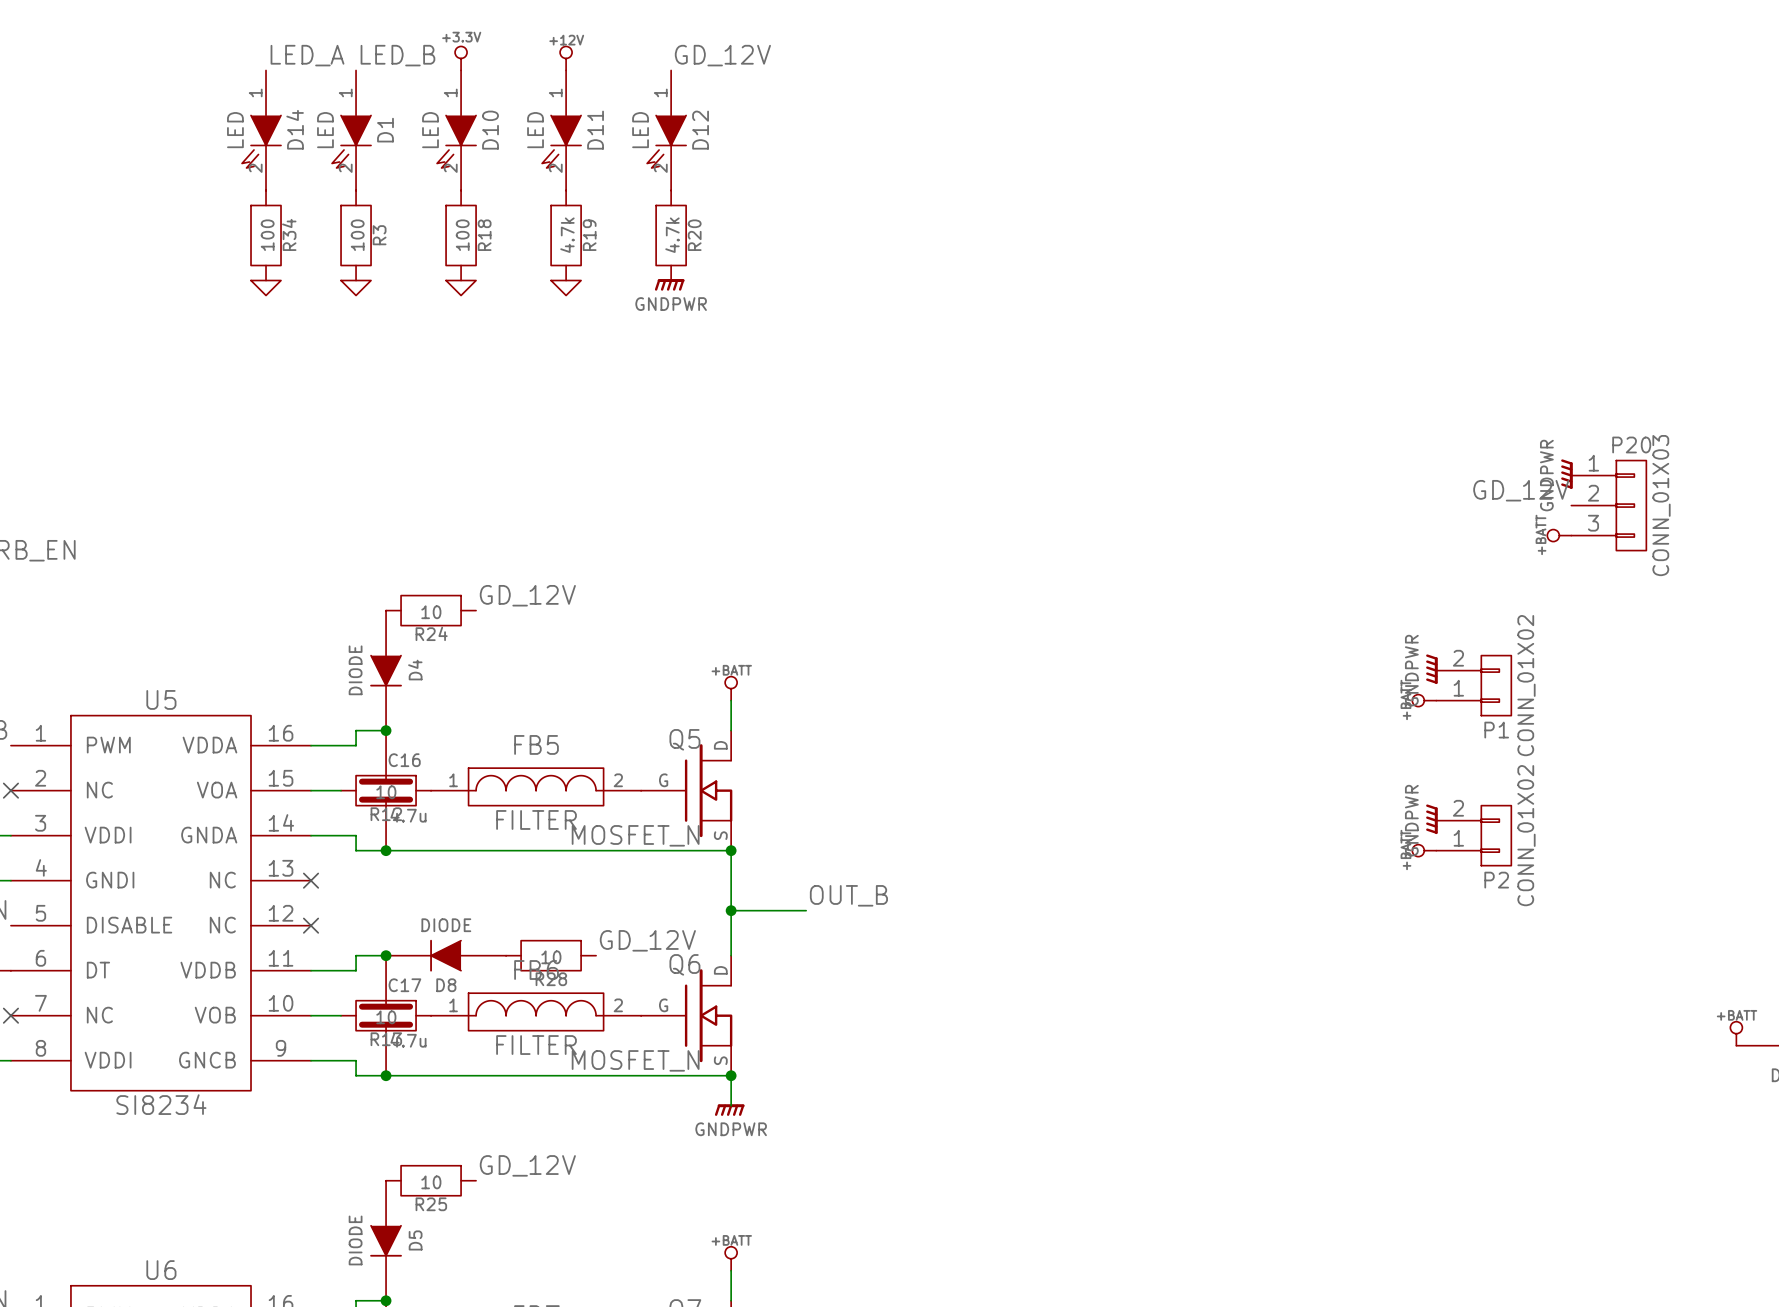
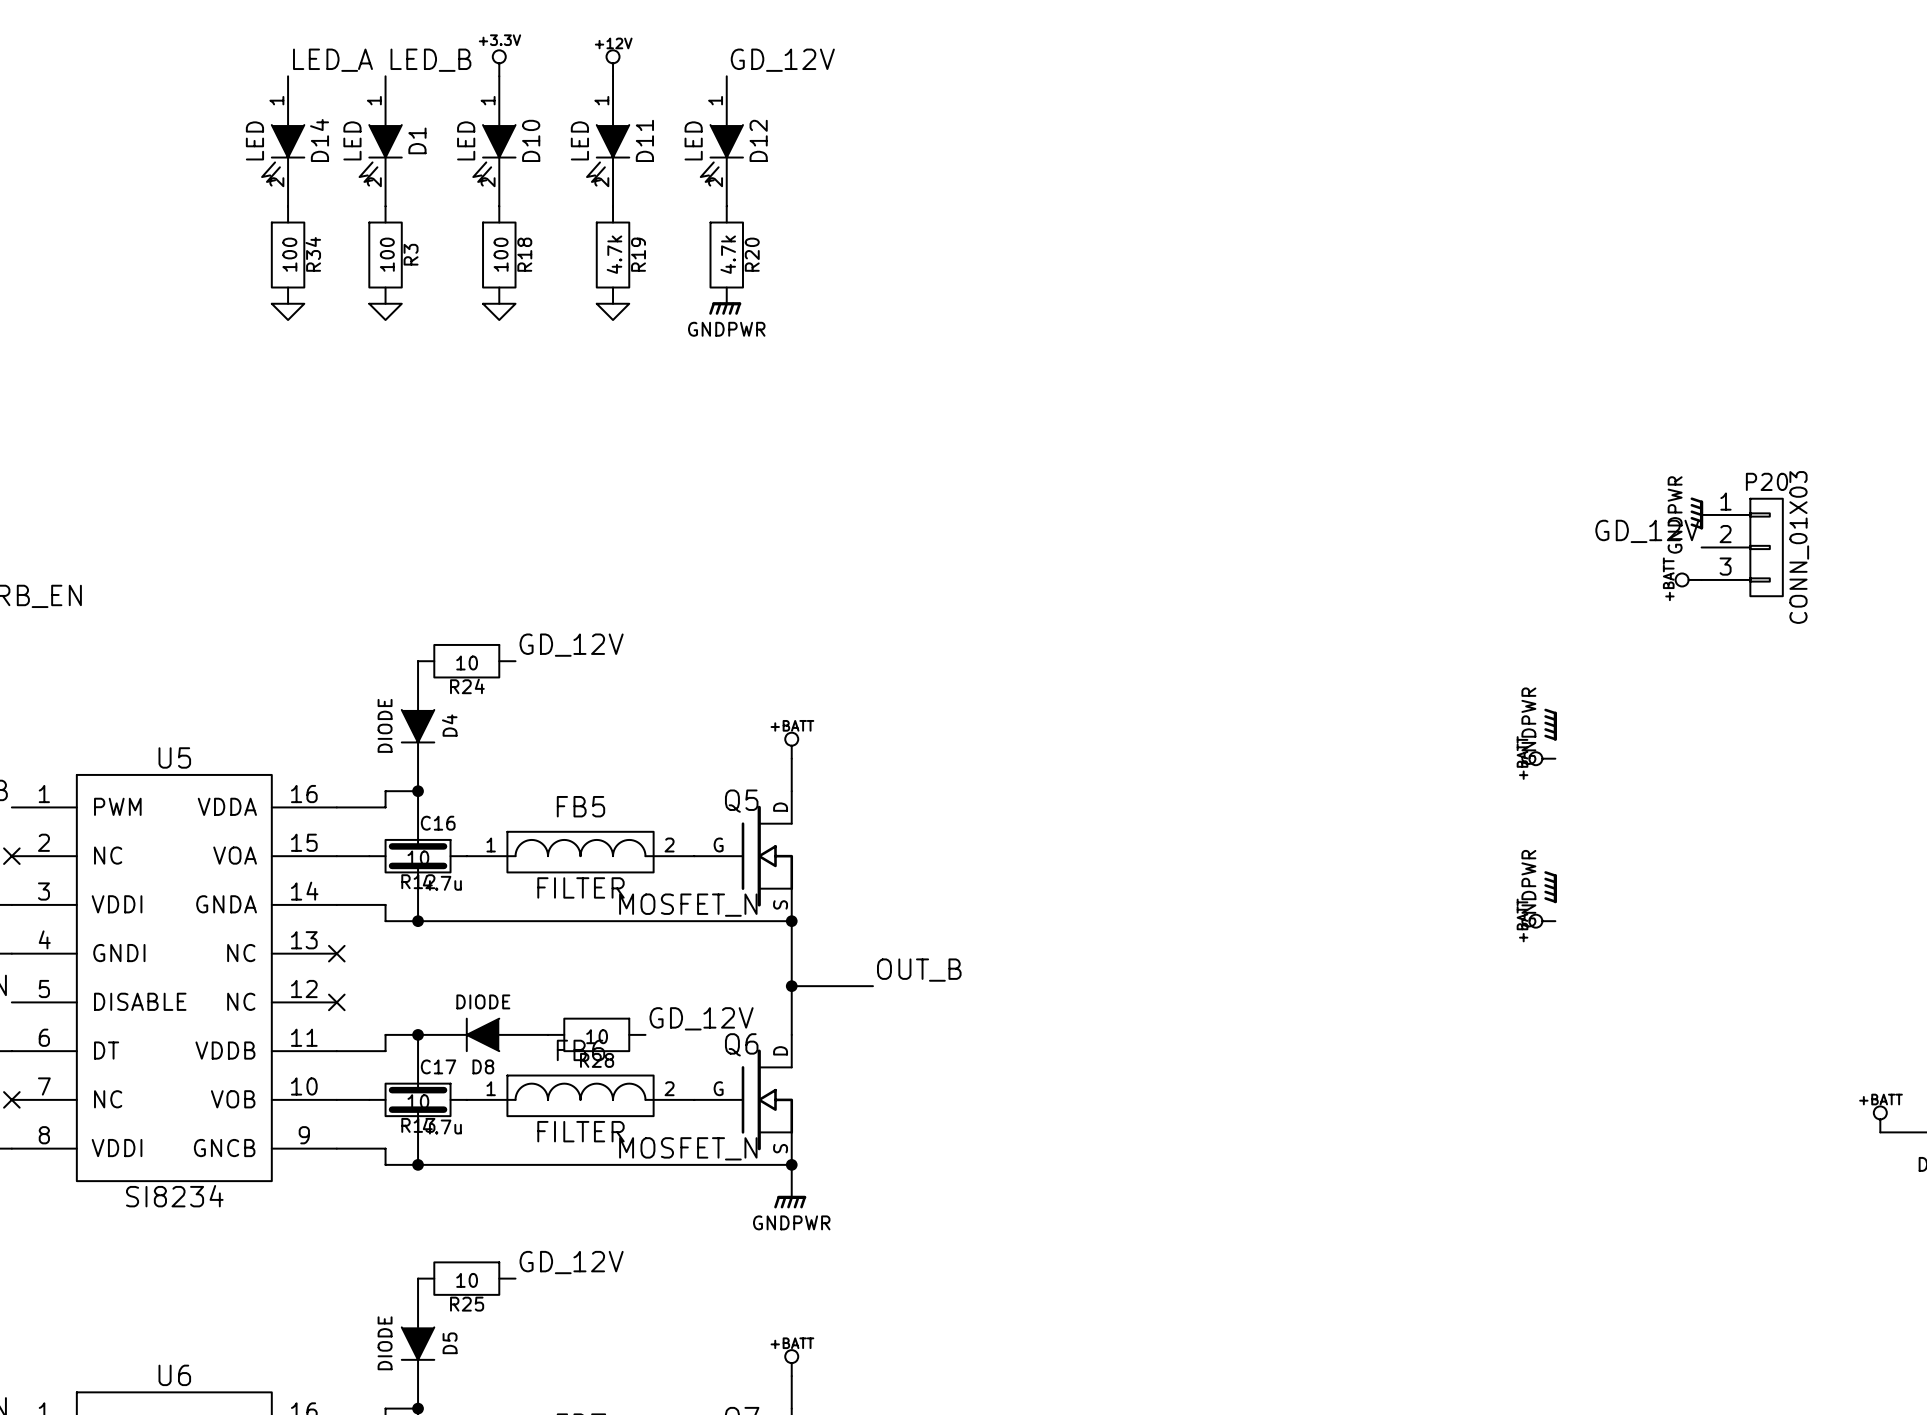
P1: CONN_01X02 (1473, 685) -> none
P2: CONN_01X02 (1473, 835) -> none

